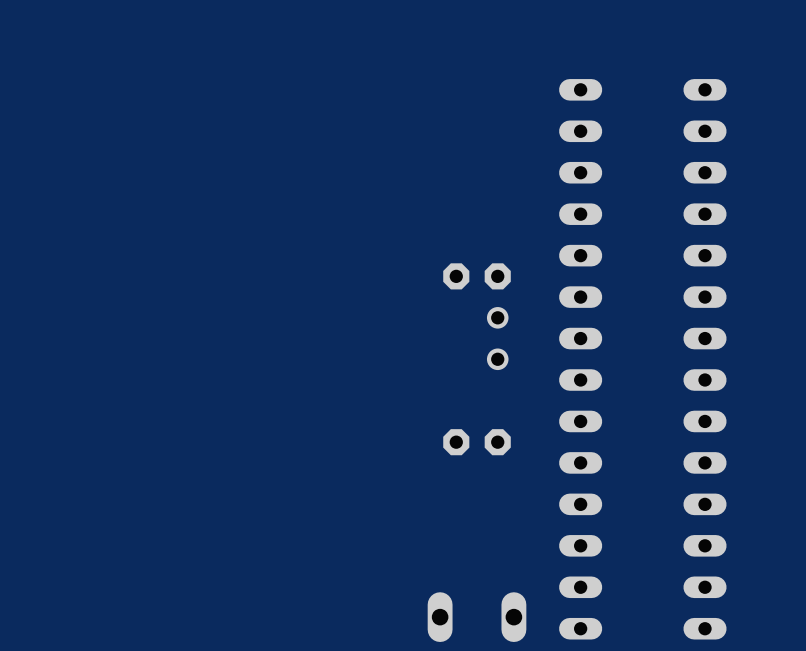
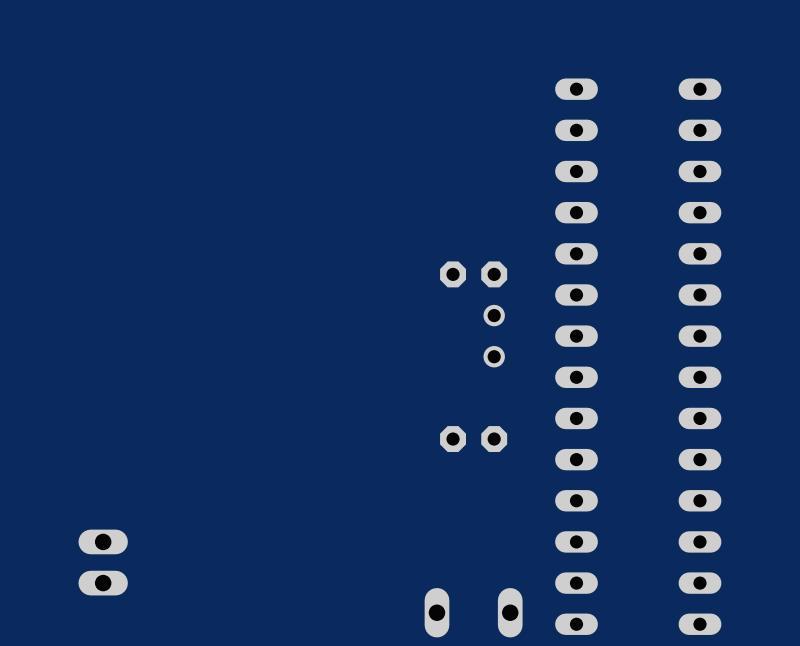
part: none -> (103, 562)

